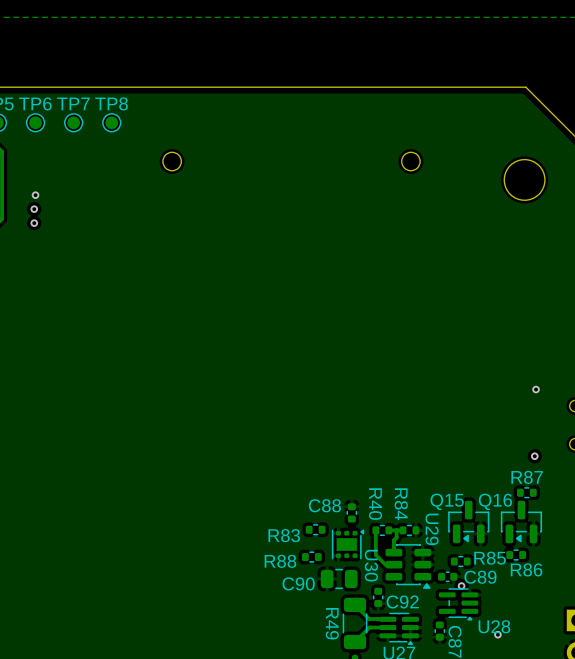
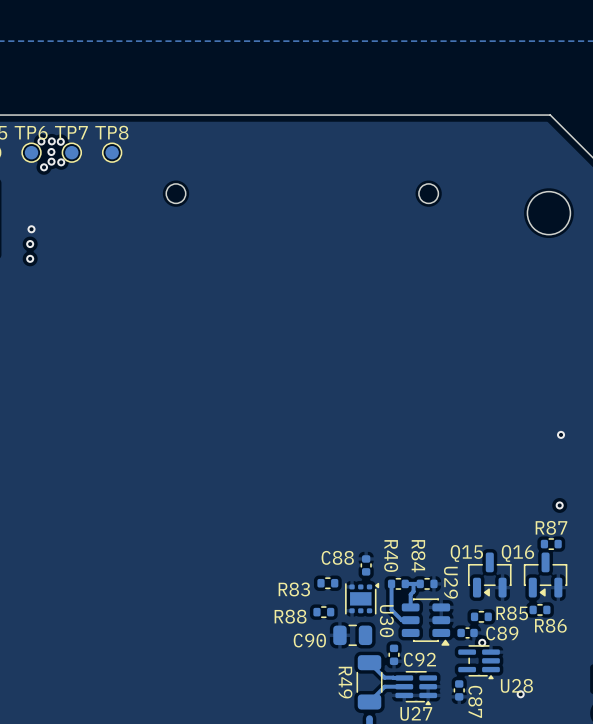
via: none -> (41, 141)
via: none -> (51, 141)
via: none -> (60, 141)
via: none -> (51, 152)
via: none -> (51, 161)
via: none -> (61, 162)
via: none -> (44, 167)

